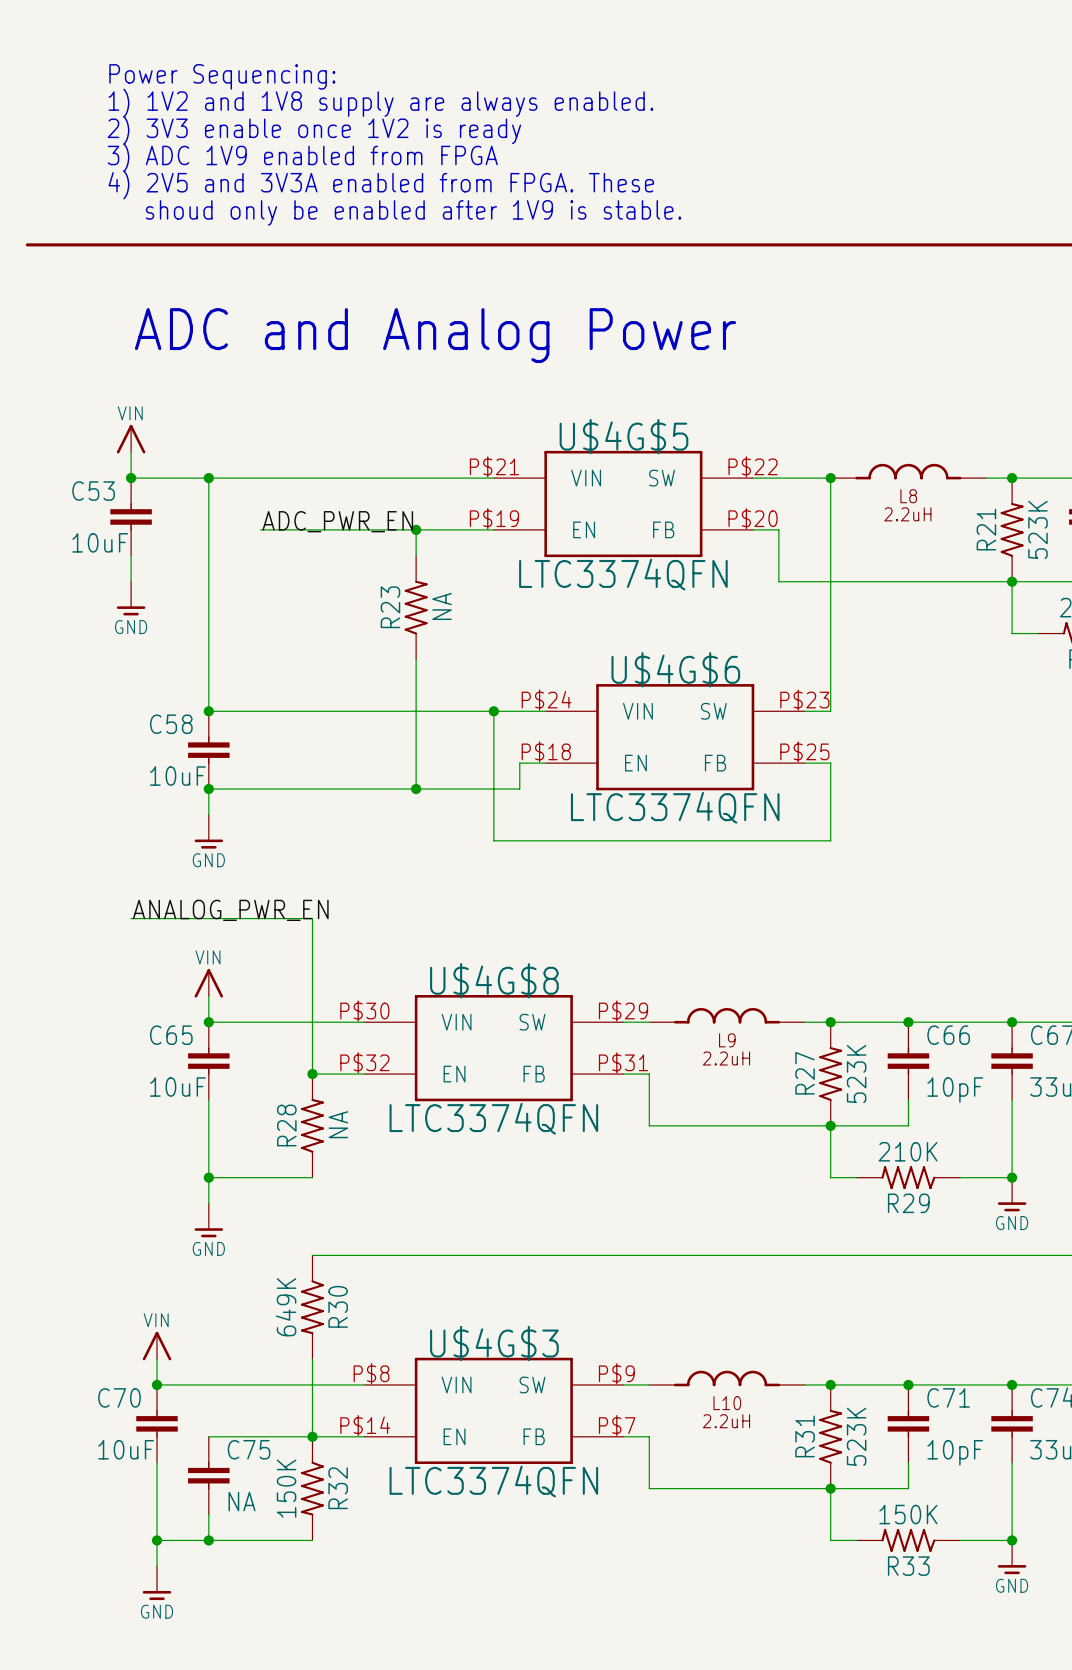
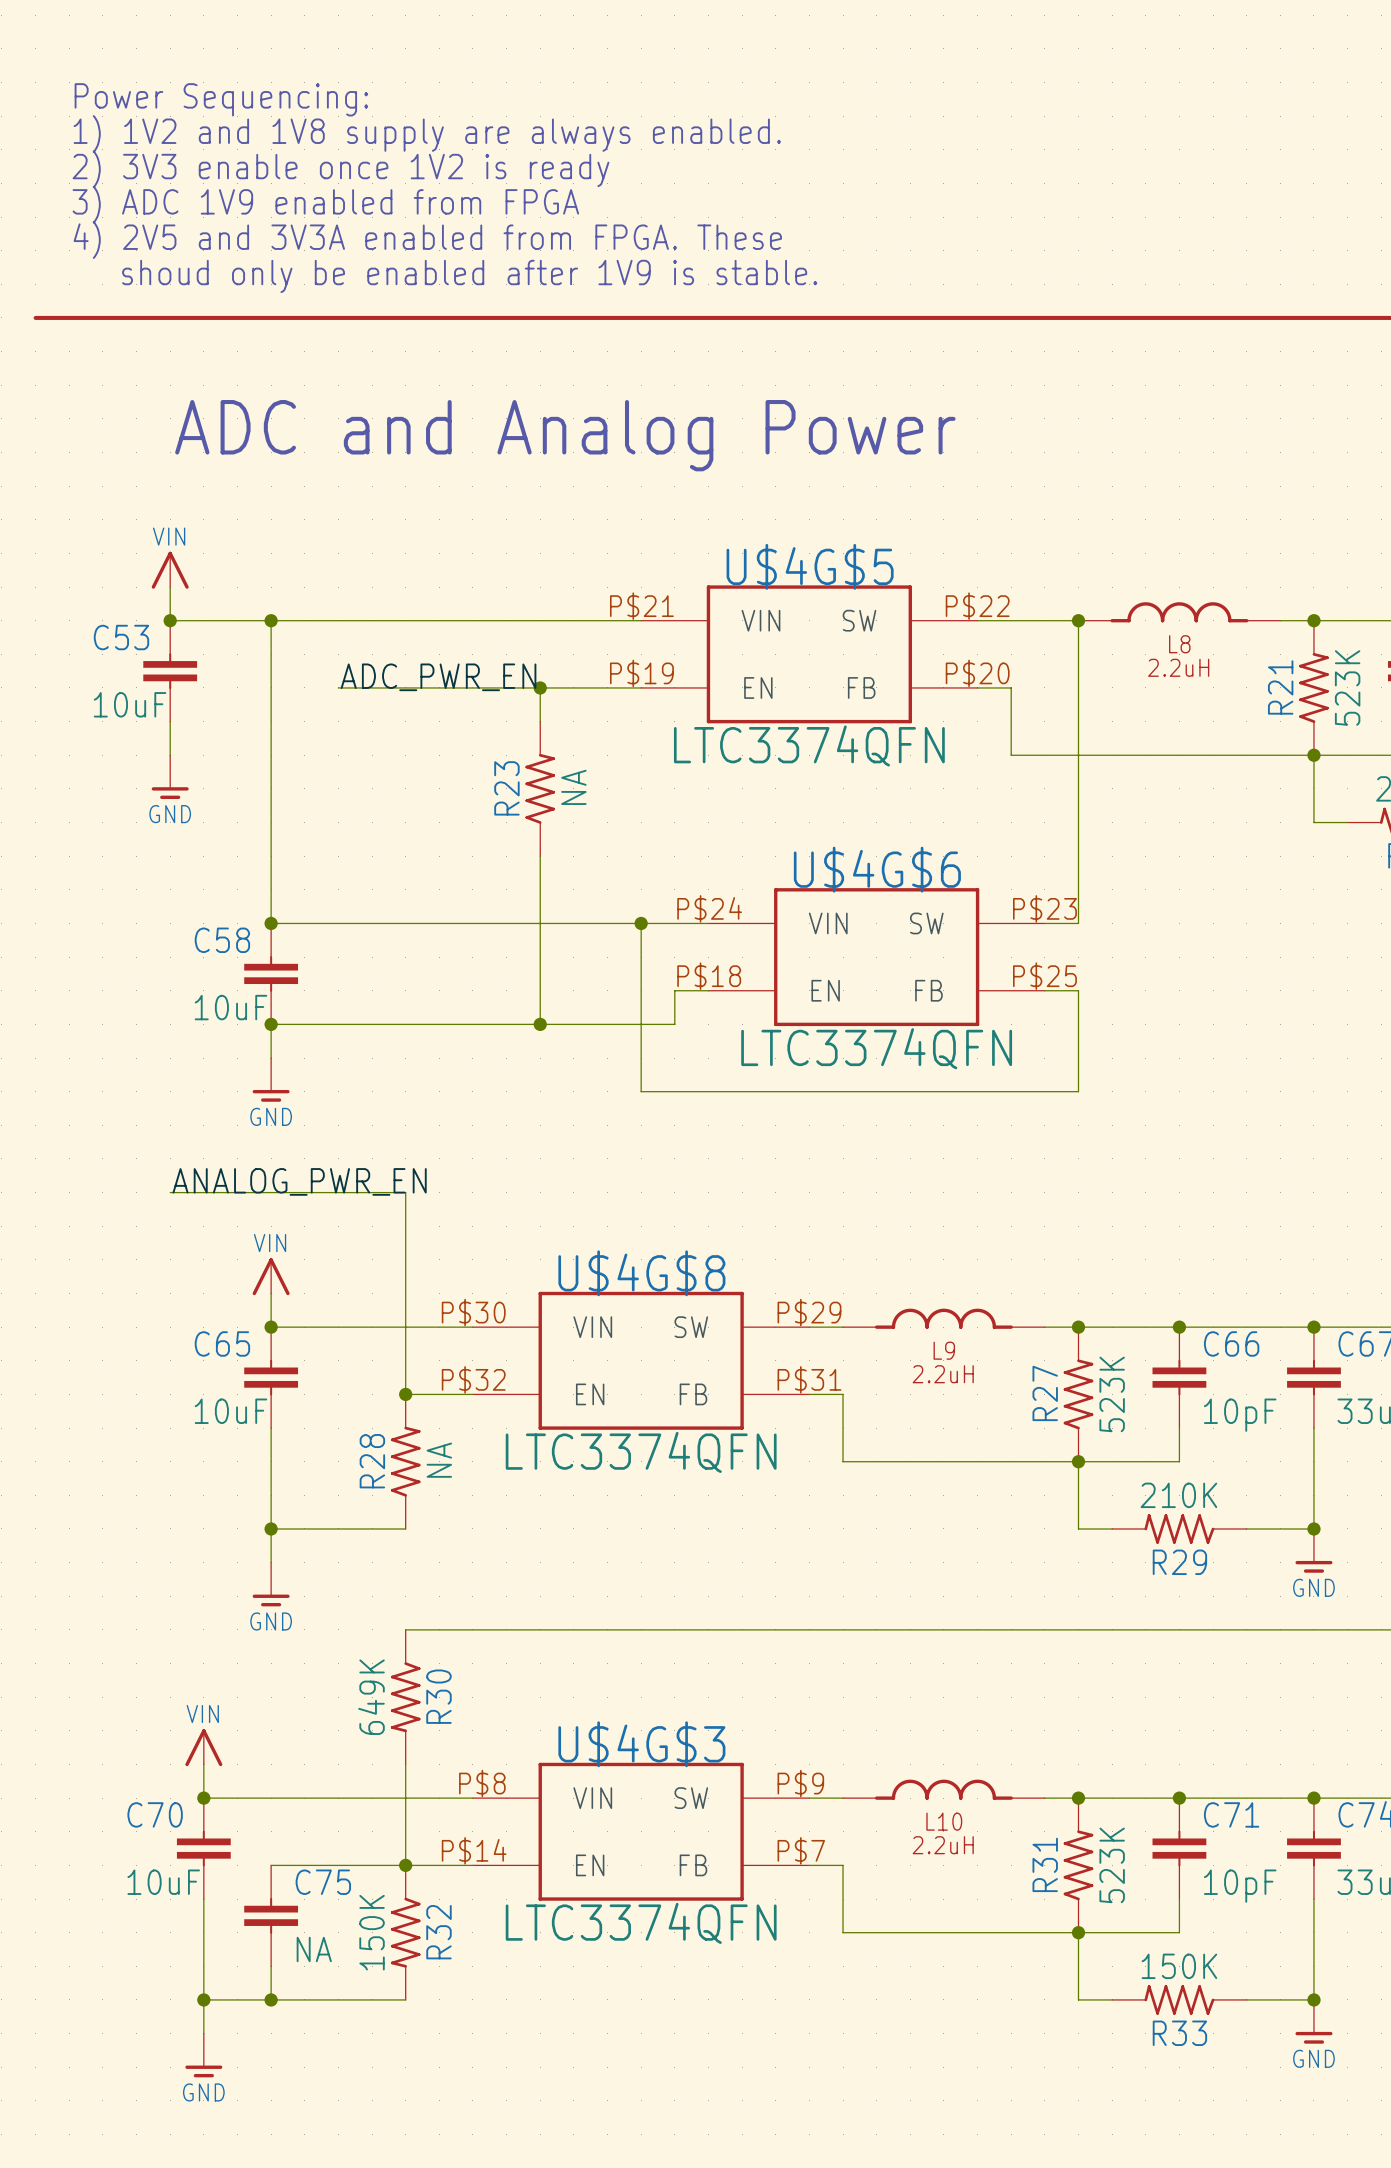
text position: Power Sequencing: (222, 76) -> Power Sequencing: (221, 99)
text position: 1) 1V2 and 1V8 supply are always enabled. (380, 103) -> 1) 1V2 and 1V8 supply are always enabled. (427, 134)
text position: 2) 3V3 enable once 1V2 is ready (314, 130) -> 2) 3V3 enable once 1V2 is ready (340, 169)
text position: 3) ADC 1V9 enabled from FPGA (302, 157) -> 3) ADC 1V9 enabled from FPGA (325, 204)
text position: 4) 2V5 and 3V3A enabled from FPGA. These (381, 184) -> 4) 2V5 and 3V3A enabled from FPGA. These (427, 240)
text position: shoud only be enabled after 1V9 is stable. (413, 212) -> shoud only be enabled after 1V9 is stable. (469, 276)

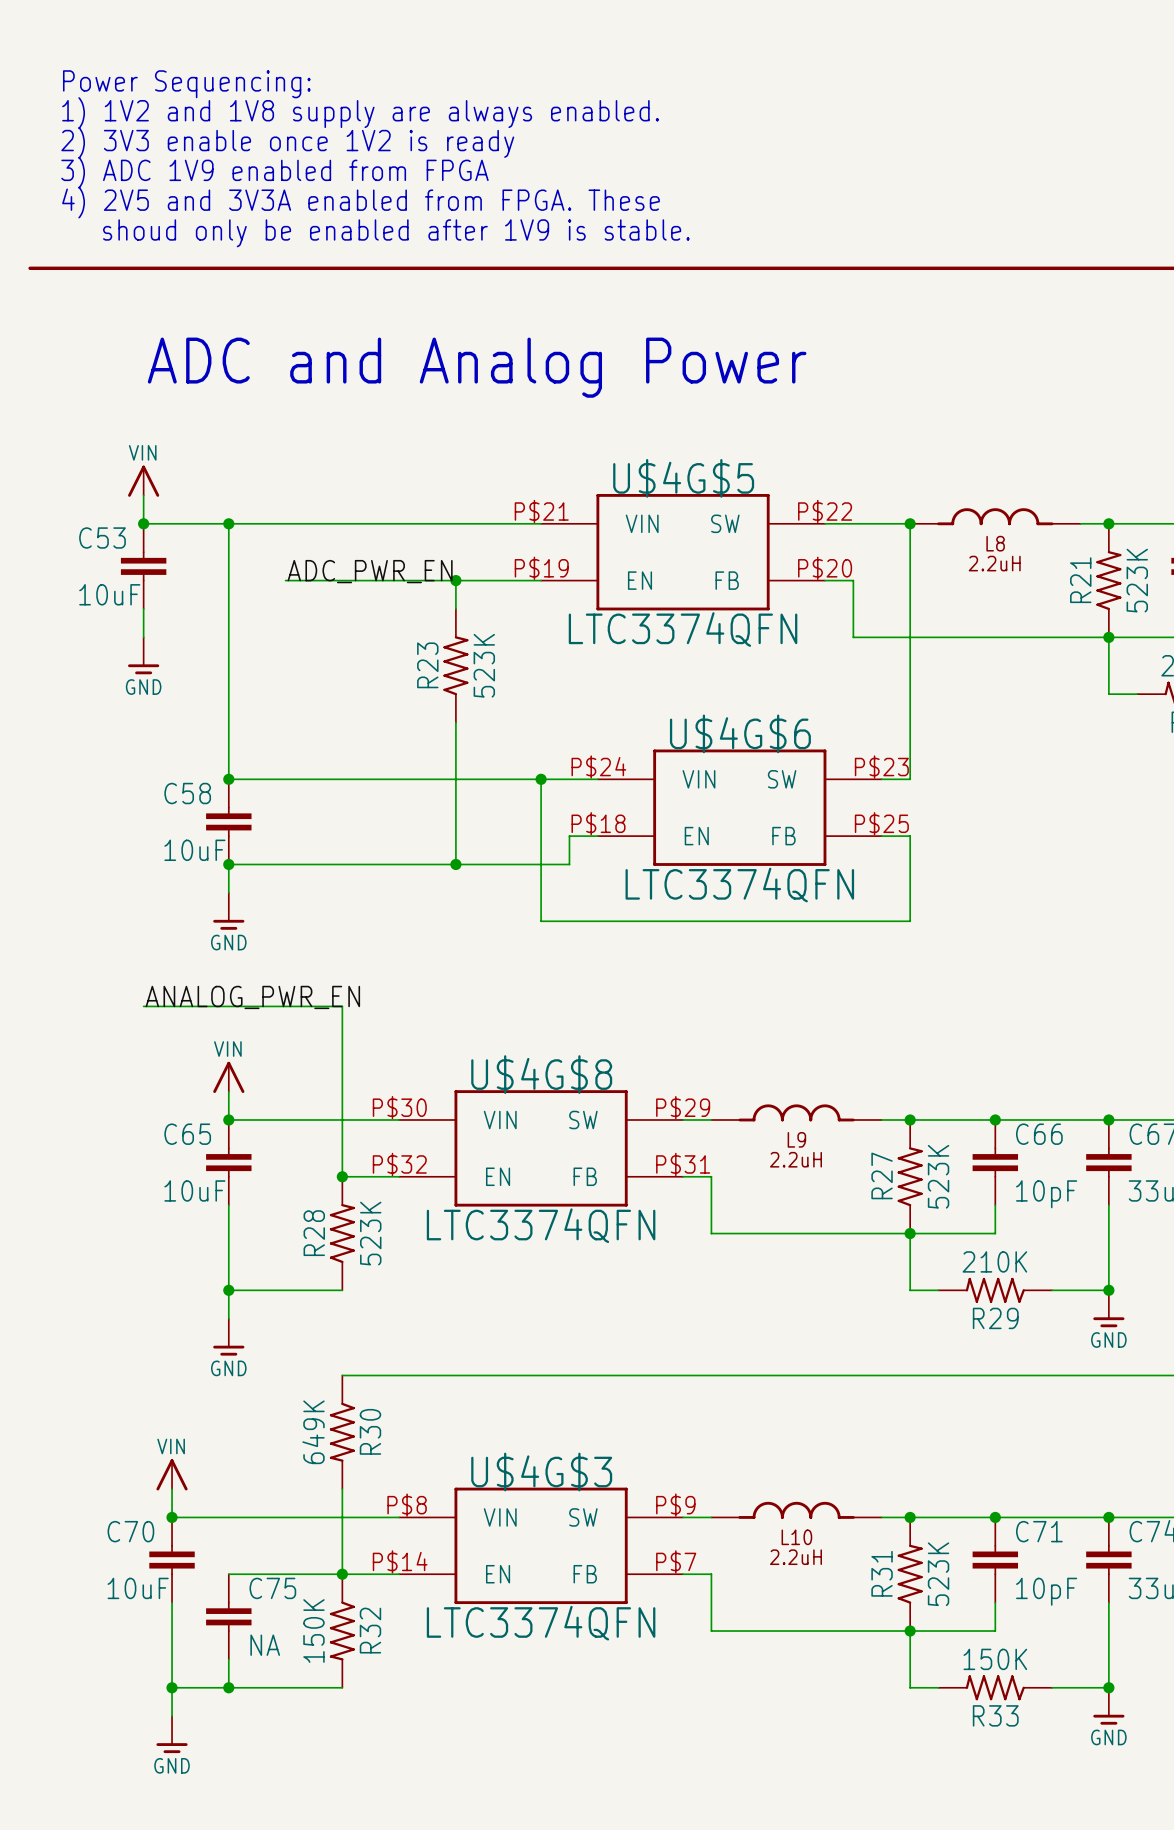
R23 value: NA (573, 787) -> 523K (484, 665)
R28 value: NA (439, 1460) -> 523K (370, 1233)

